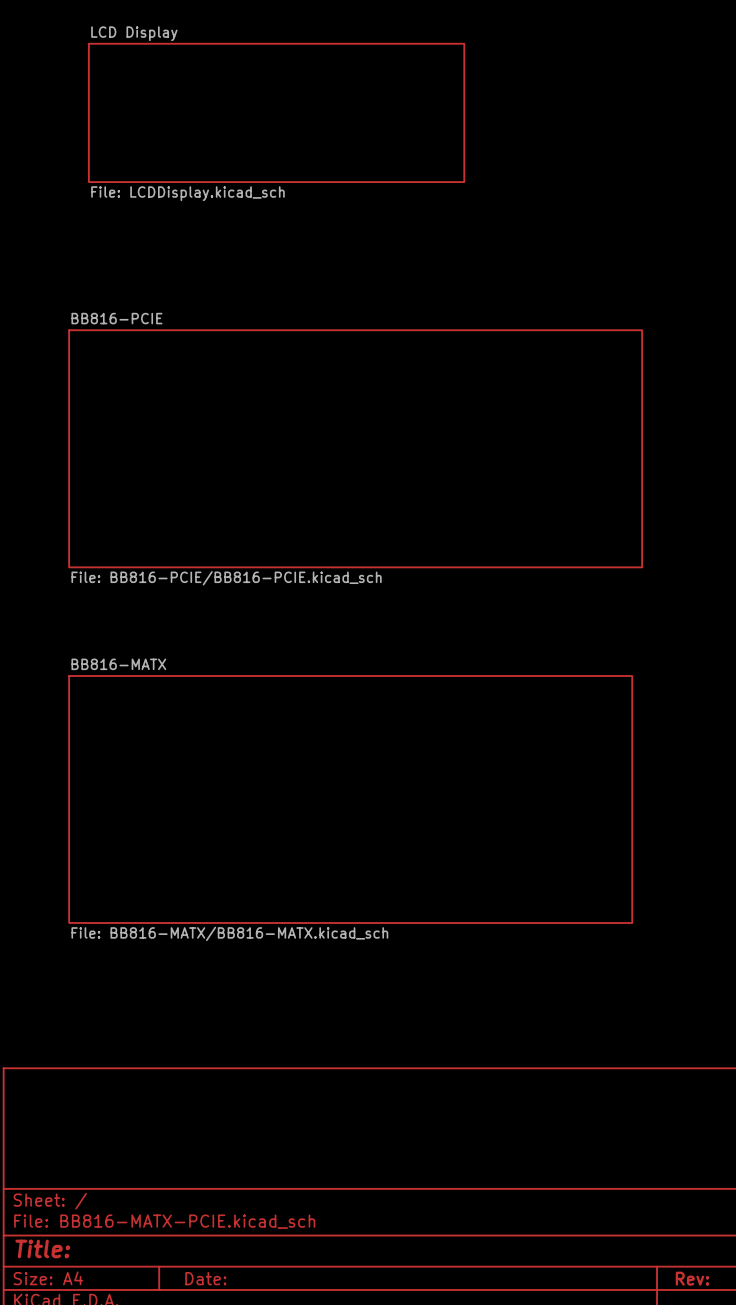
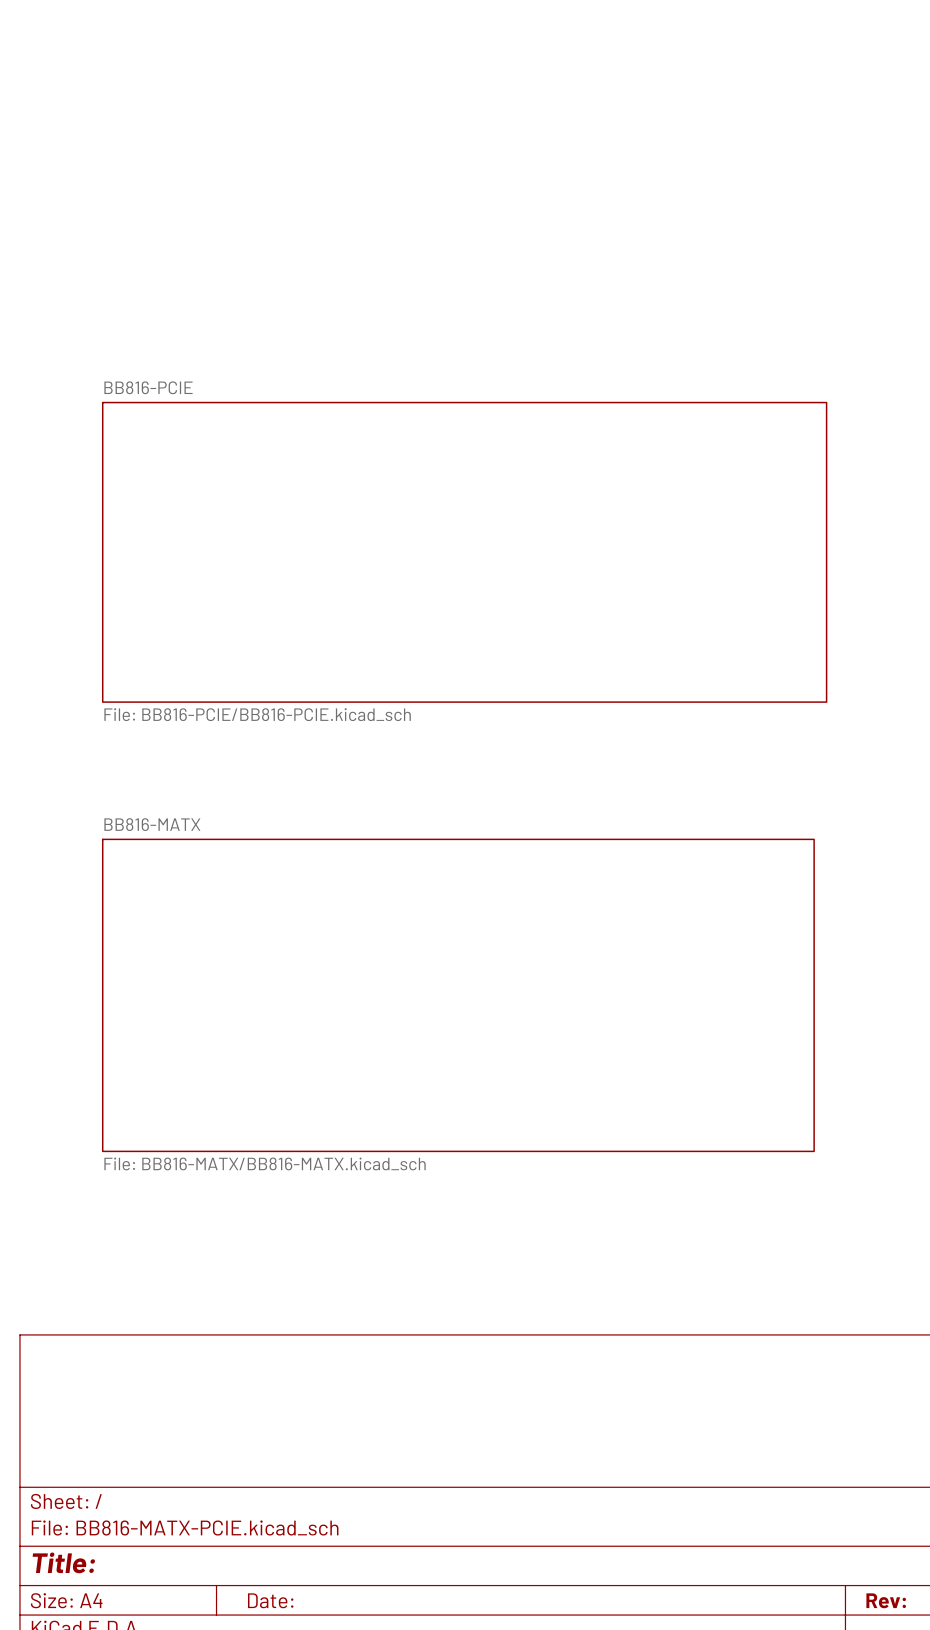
sheet LCD Display: File: LCDDisplay.kicad_sch (276, 112) -> none

